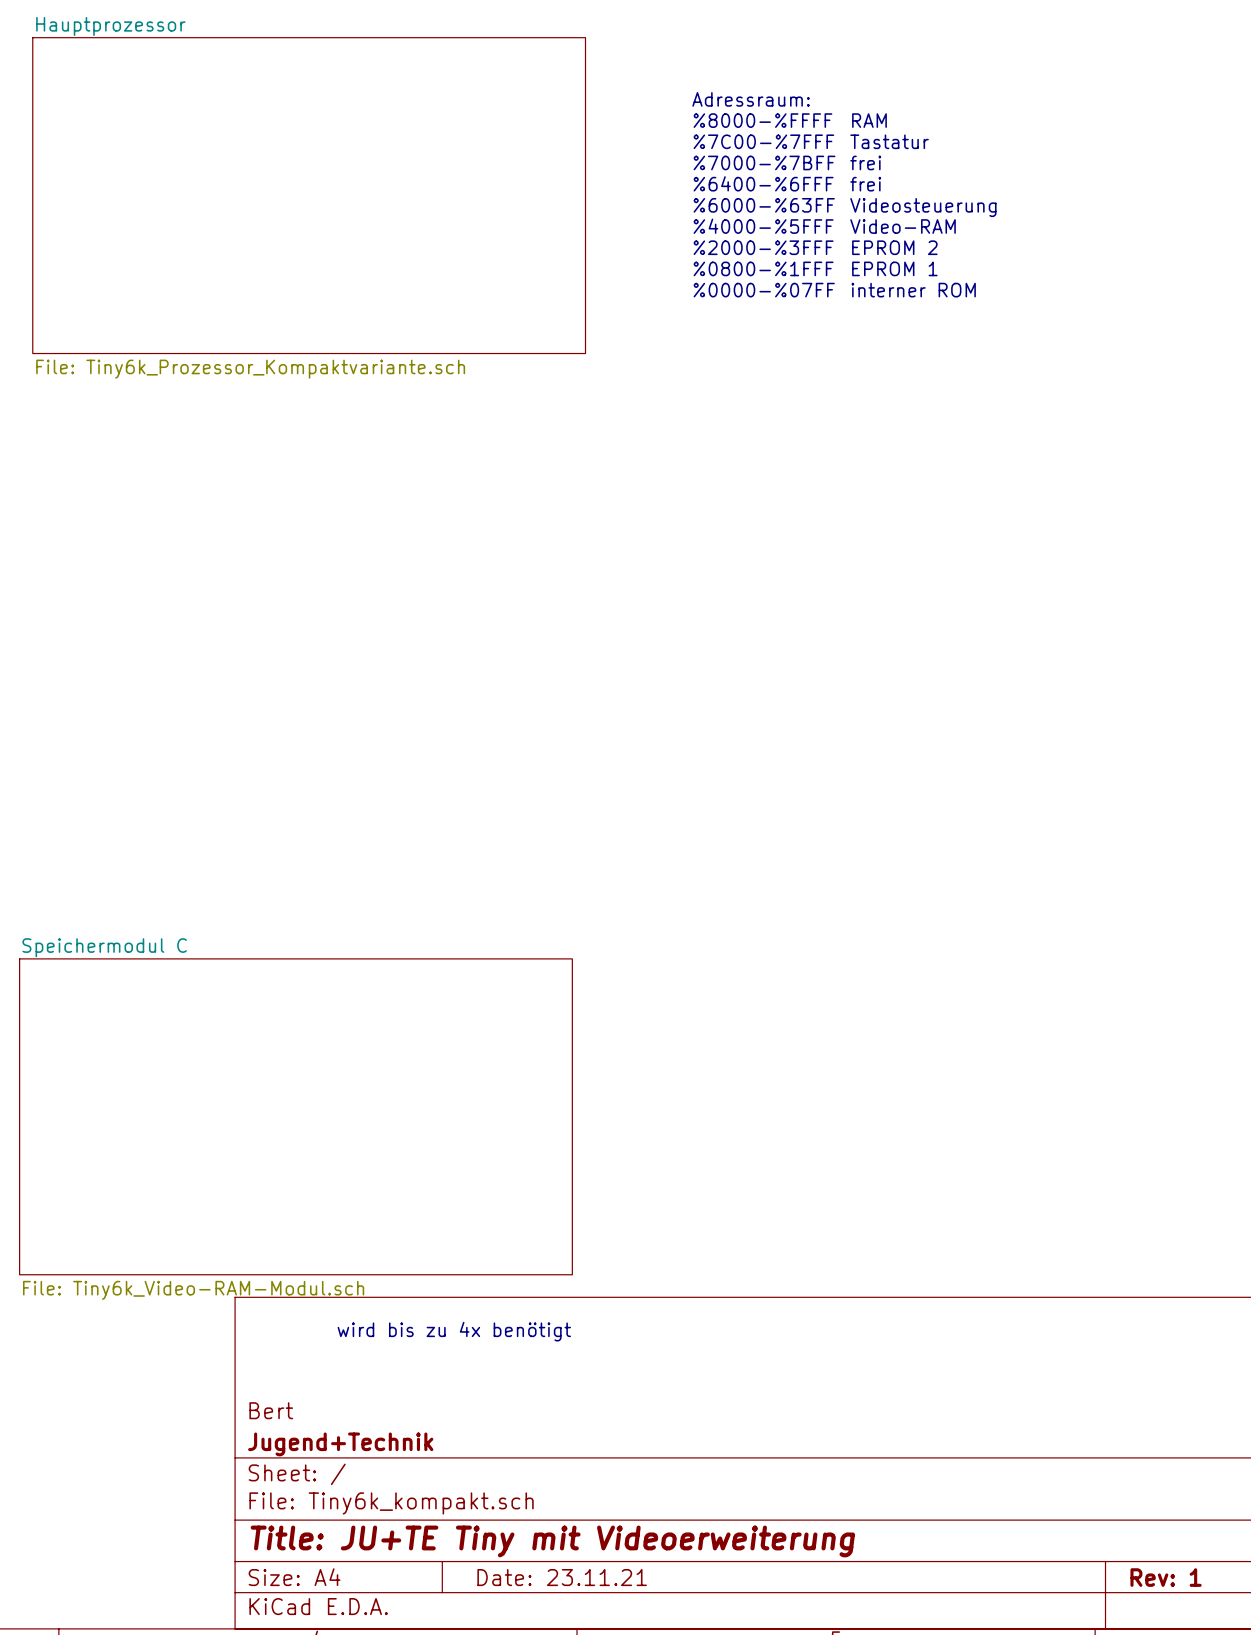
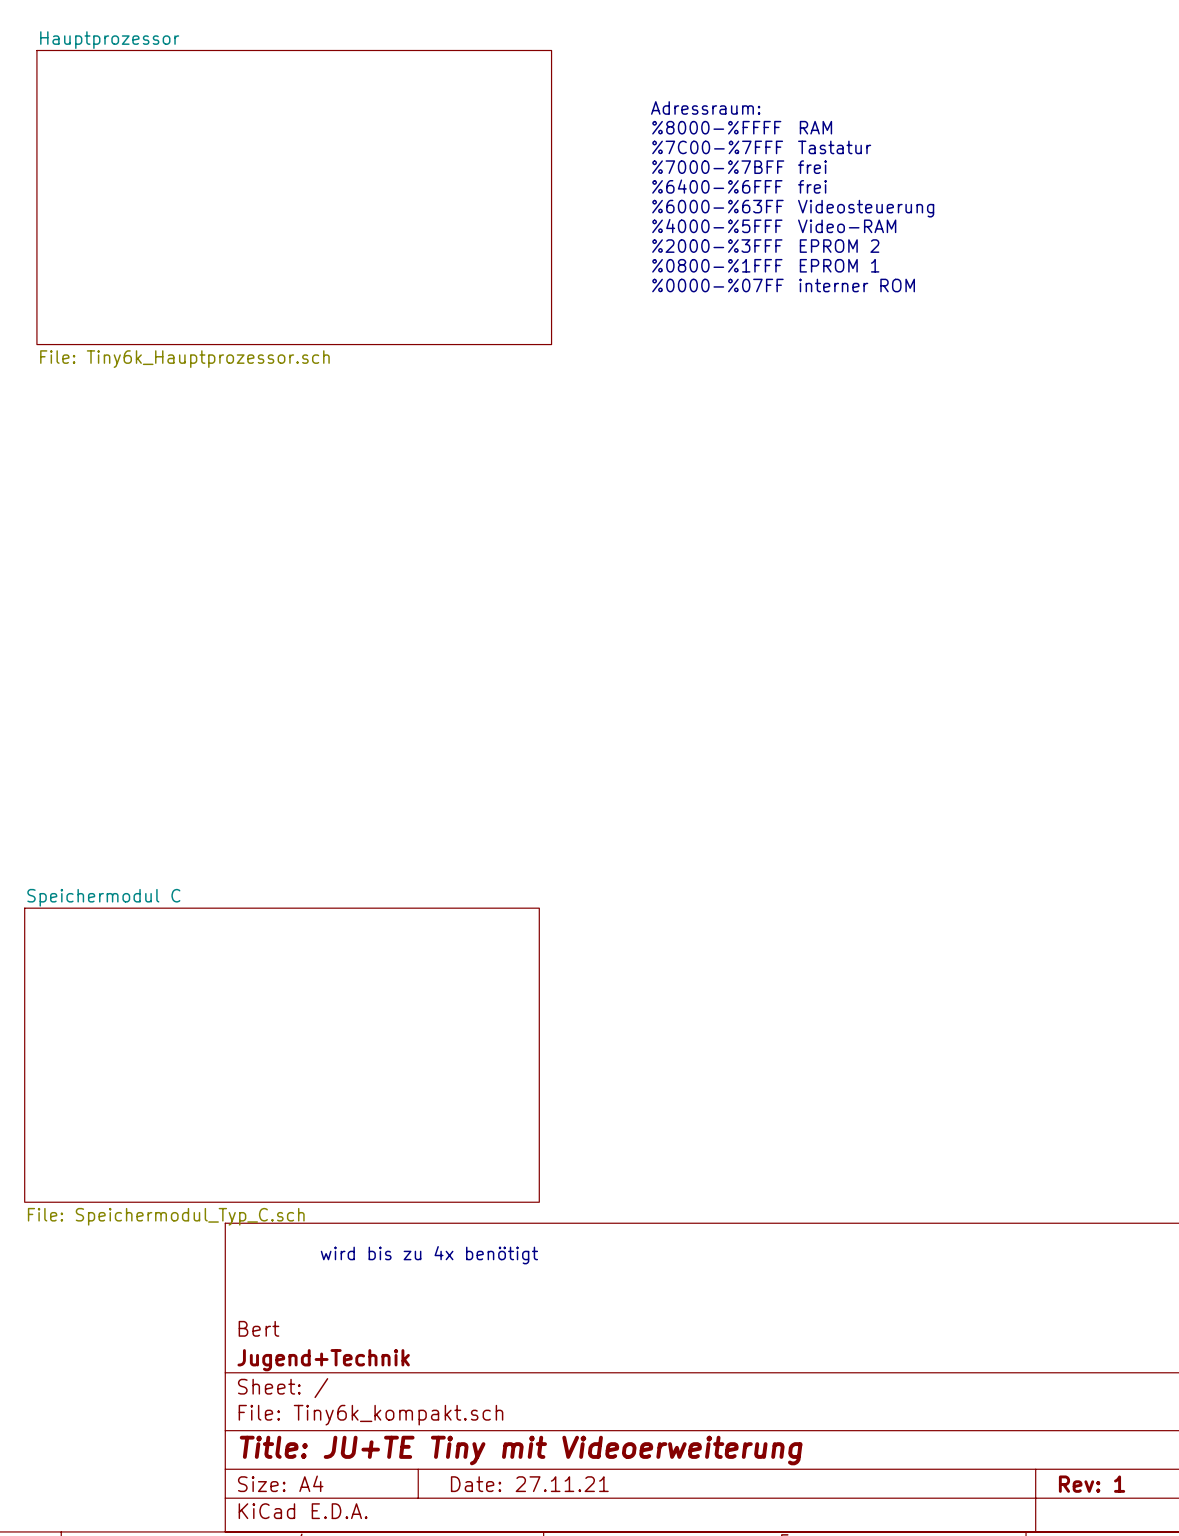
sheet Hauptprozessor value: File: Tiny6k_Prozessor_Kompaktvariante.sch (250, 369) -> File: Tiny6k_Hauptprozessor.sch (184, 359)
sheet Speichermodul C value: File: Tiny6k_Video-RAM-Modul.sch (193, 1290) -> File: Speichermodul_Typ_C.sch (166, 1216)
title block: Date: 23.11.21 (562, 1577) -> Date: 27.11.21 (529, 1484)

